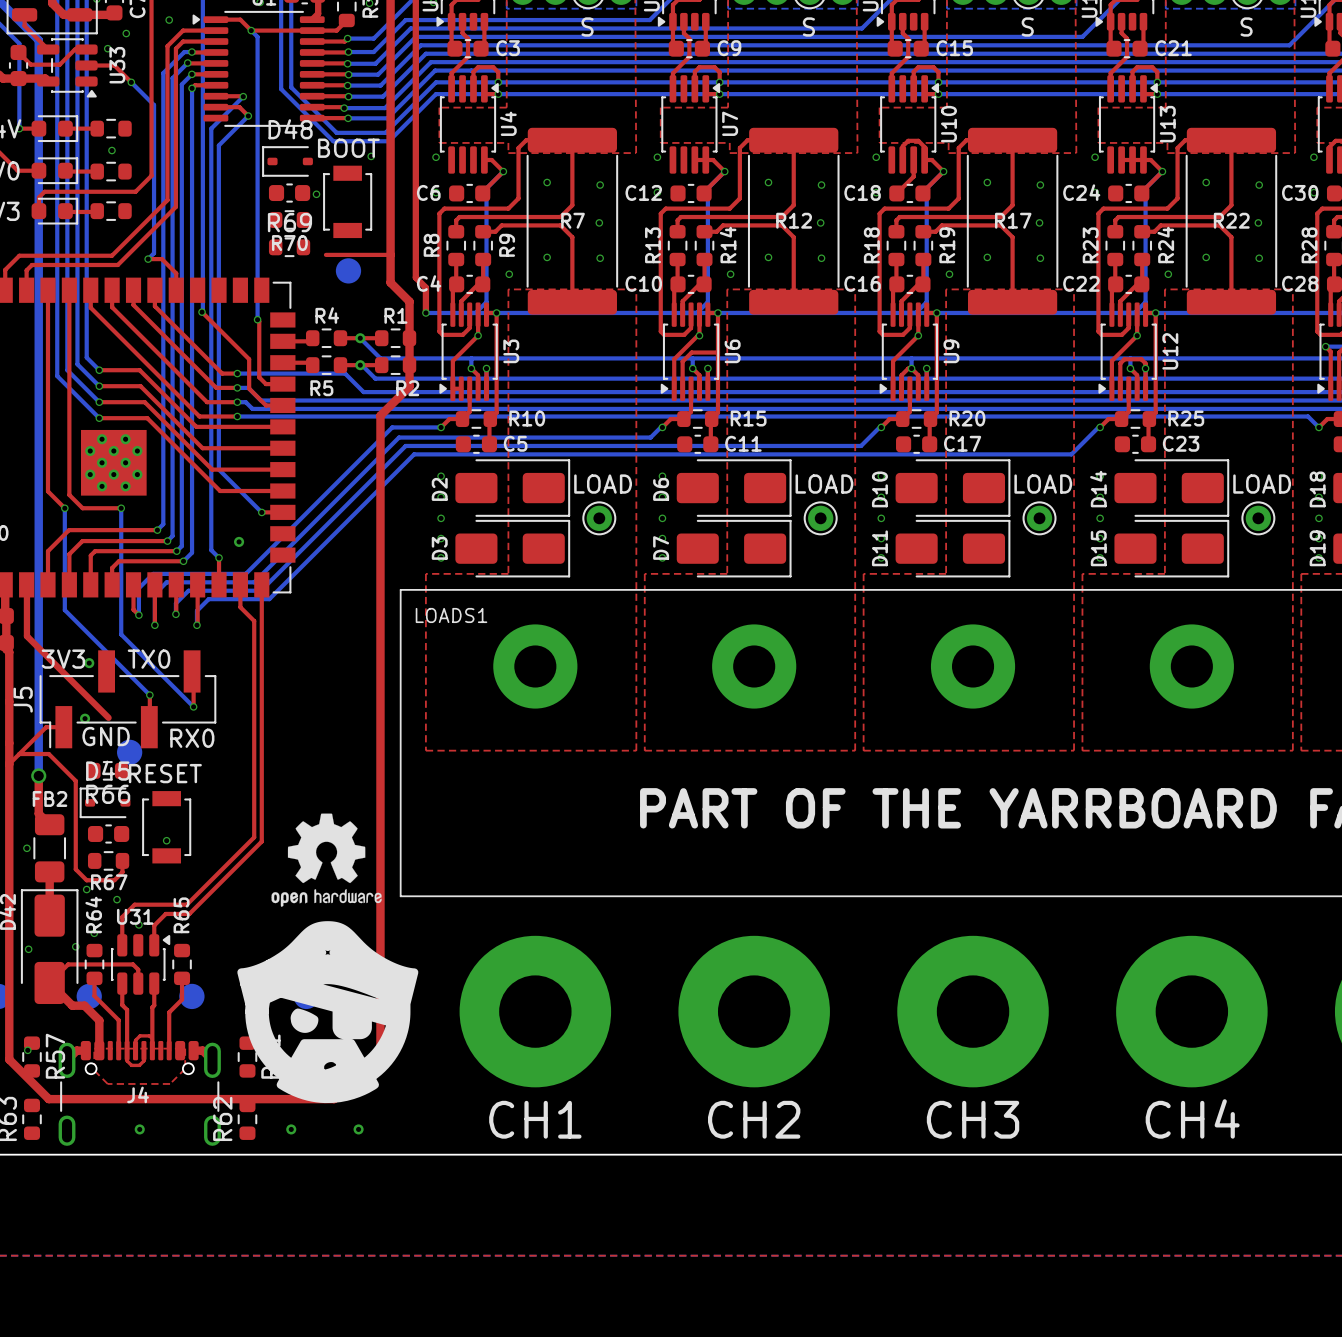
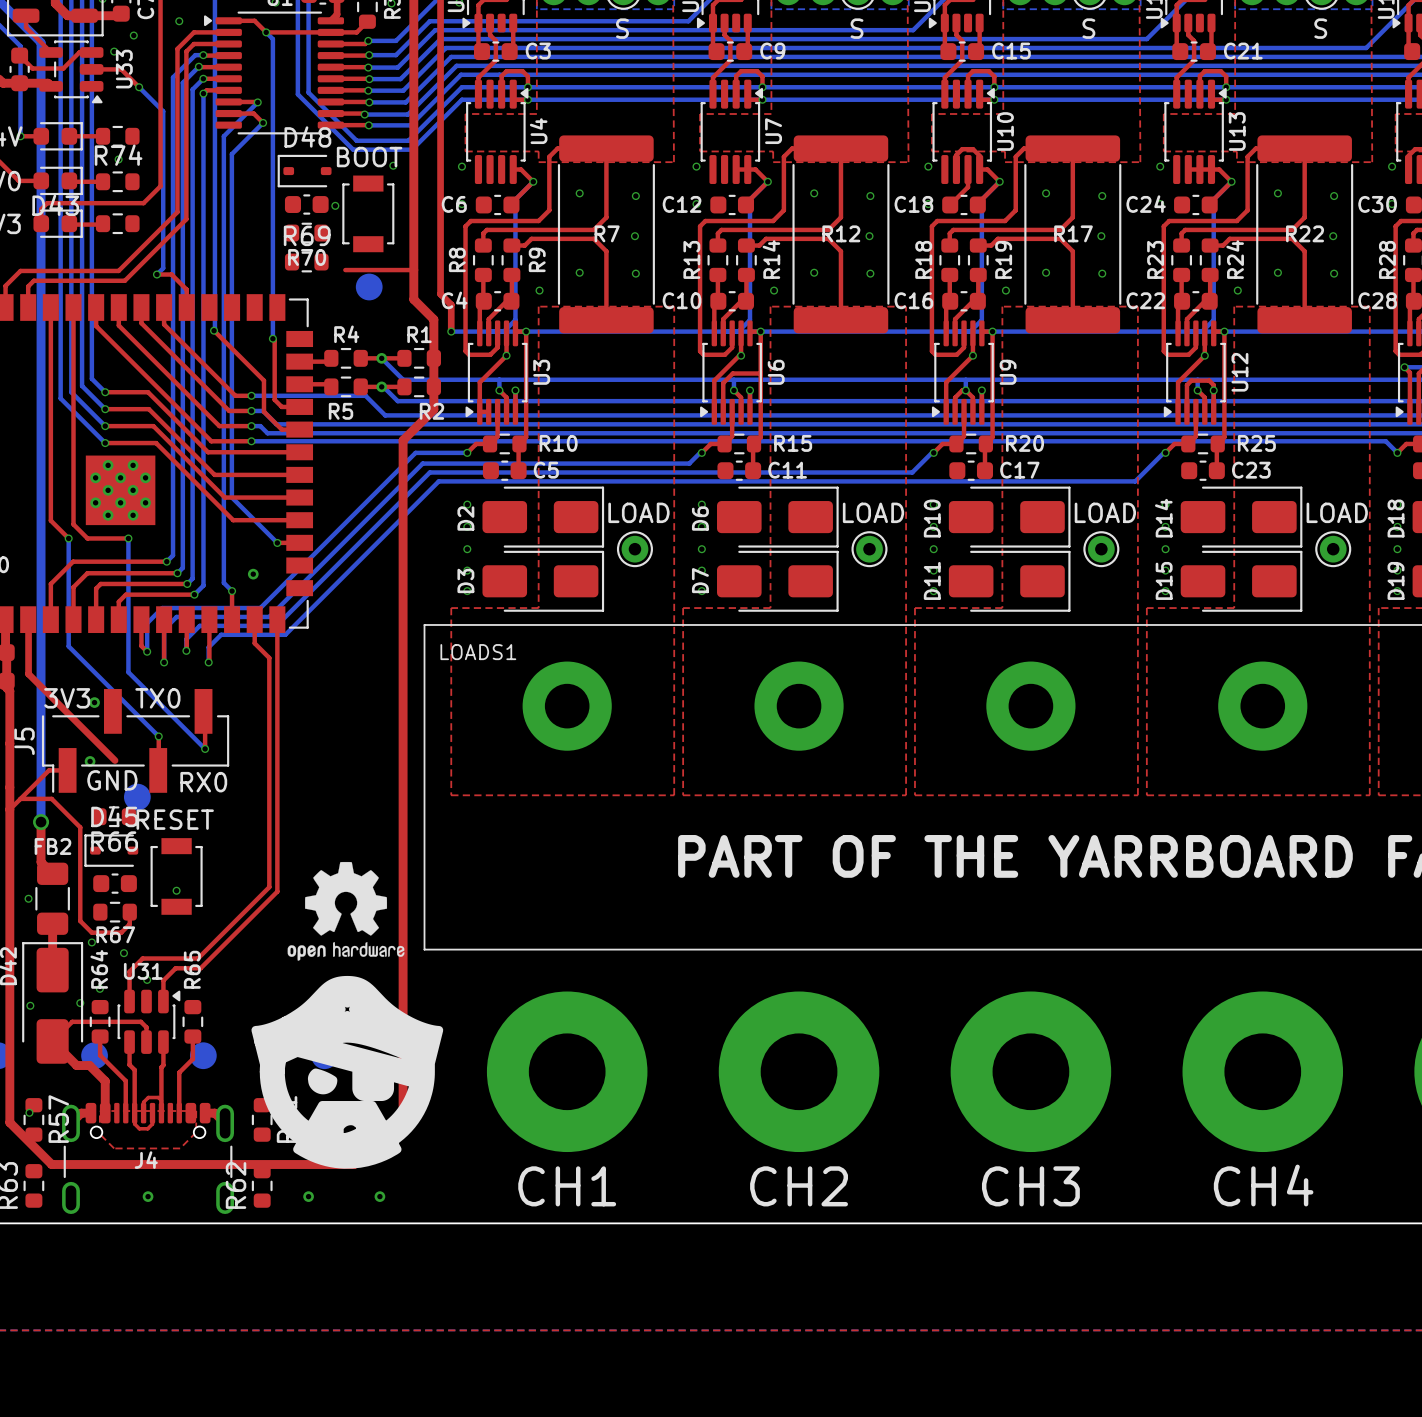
R74 name: none -> R74 (118, 155)
D43 name: none -> D43 (55, 205)

